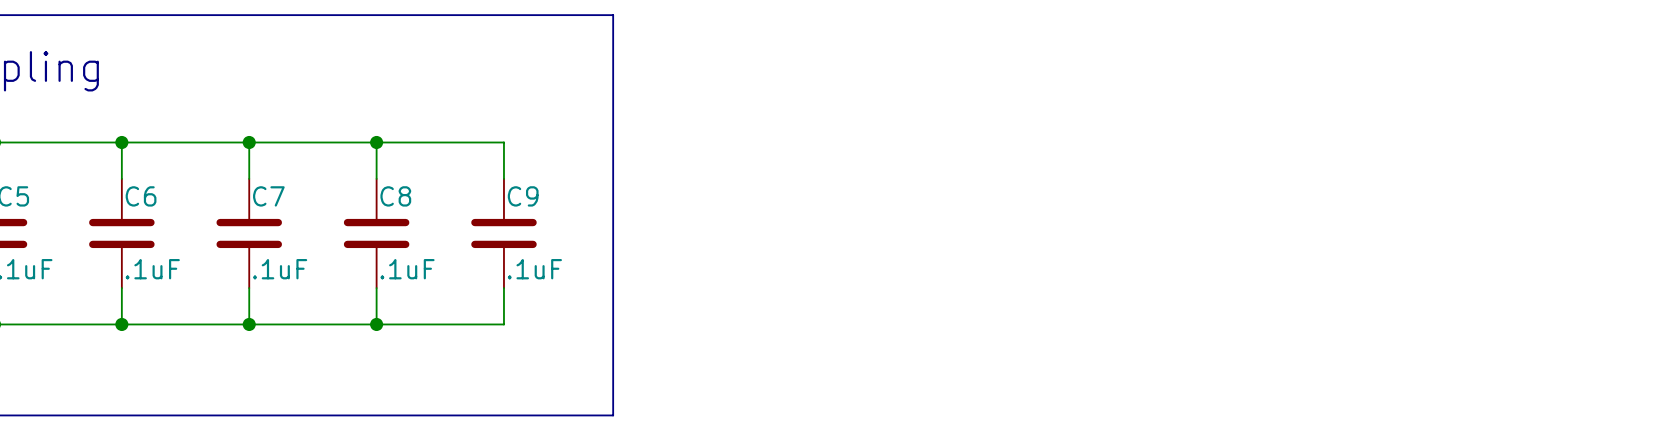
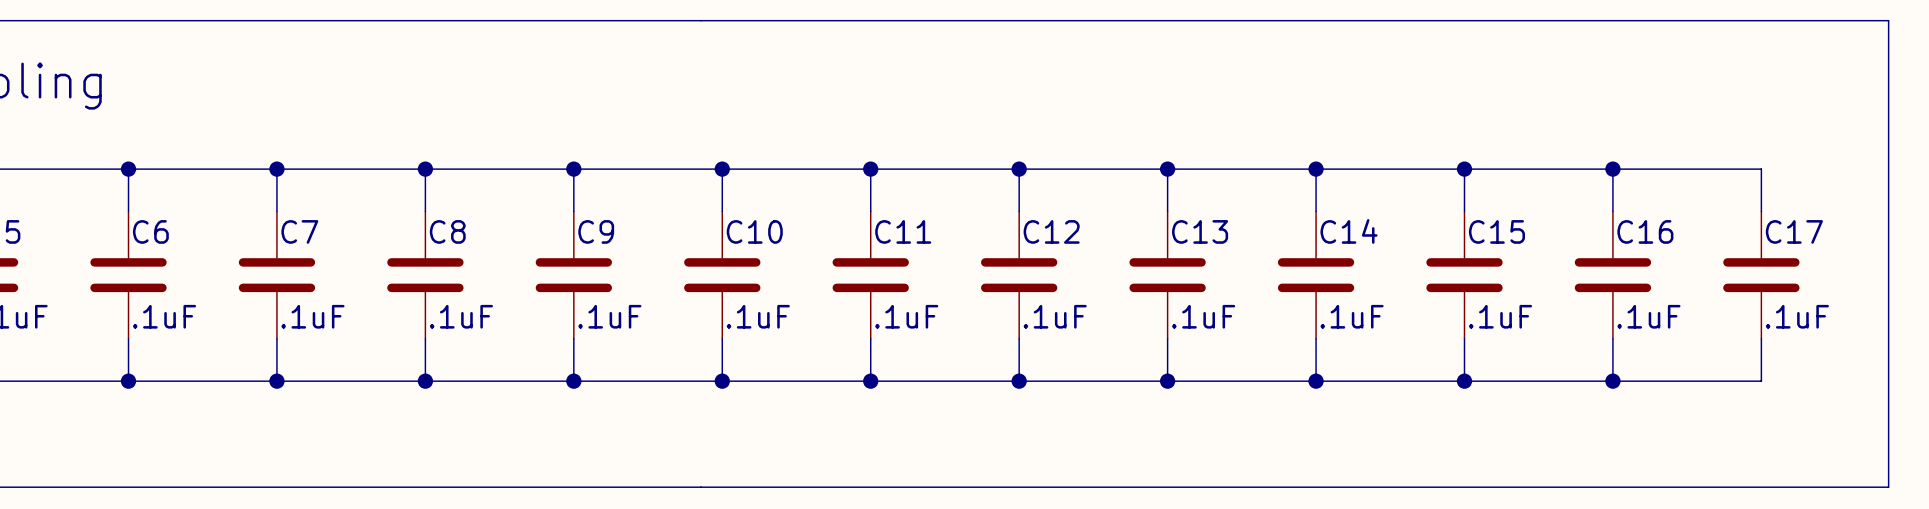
line: (613, 15) (613, 415) -> (701, 20) (1888, 20) (1888, 487) (701, 487)
wire: none -> (573, 169) (1761, 169) (1761, 211)
junction: none -> (573, 169)
wire: none -> (722, 169) (722, 211)
junction: none -> (722, 169)
wire: none -> (870, 169) (870, 211)
junction: none -> (870, 169)
wire: none -> (1019, 169) (1019, 211)
junction: none -> (1019, 169)
wire: none -> (1167, 169) (1167, 211)
junction: none -> (1167, 169)
wire: none -> (1316, 169) (1316, 211)
junction: none -> (1316, 169)
wire: none -> (1464, 169) (1464, 211)
junction: none -> (1464, 169)
wire: none -> (1612, 169) (1612, 211)
junction: none -> (1612, 169)
C10: none -> .1uF (722, 275)
C11: none -> .1uF (870, 275)
C12: none -> .1uF (1019, 275)
C13: none -> .1uF (1167, 275)
C14: none -> .1uF (1316, 275)
C15: none -> .1uF (1464, 275)
C16: none -> .1uF (1612, 275)
C17: none -> .1uF (1761, 275)
wire: none -> (722, 338) (722, 381)
wire: none -> (870, 338) (870, 381)
wire: none -> (1019, 338) (1019, 381)
wire: none -> (1167, 338) (1167, 381)
wire: none -> (1316, 338) (1316, 381)
wire: none -> (1464, 338) (1464, 381)
wire: none -> (1612, 338) (1612, 381)
wire: none -> (1761, 338) (1761, 381) (573, 381)
junction: none -> (573, 381)
junction: none -> (722, 381)
junction: none -> (870, 381)
junction: none -> (1019, 381)
junction: none -> (1167, 381)
junction: none -> (1316, 381)
junction: none -> (1464, 381)
junction: none -> (1612, 381)

